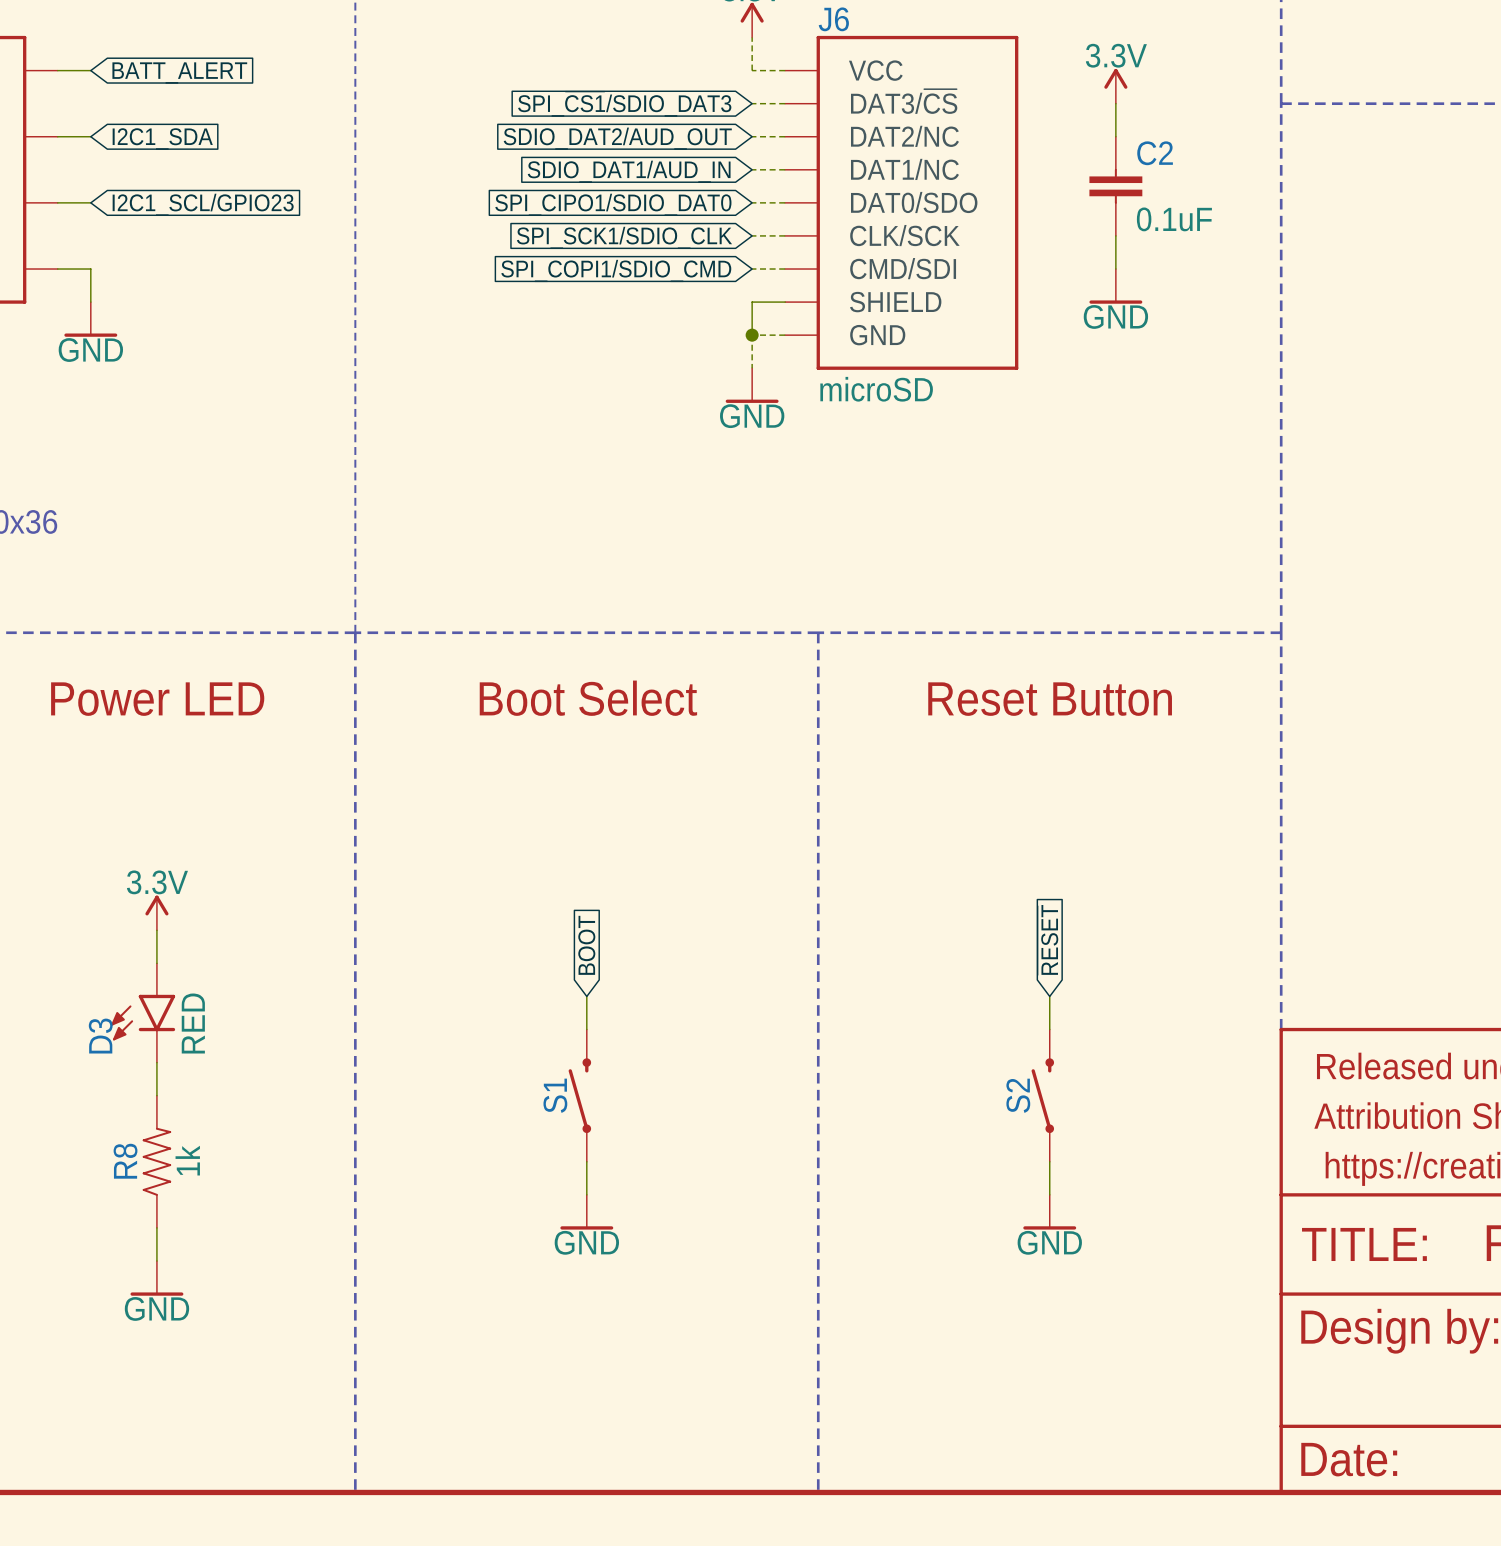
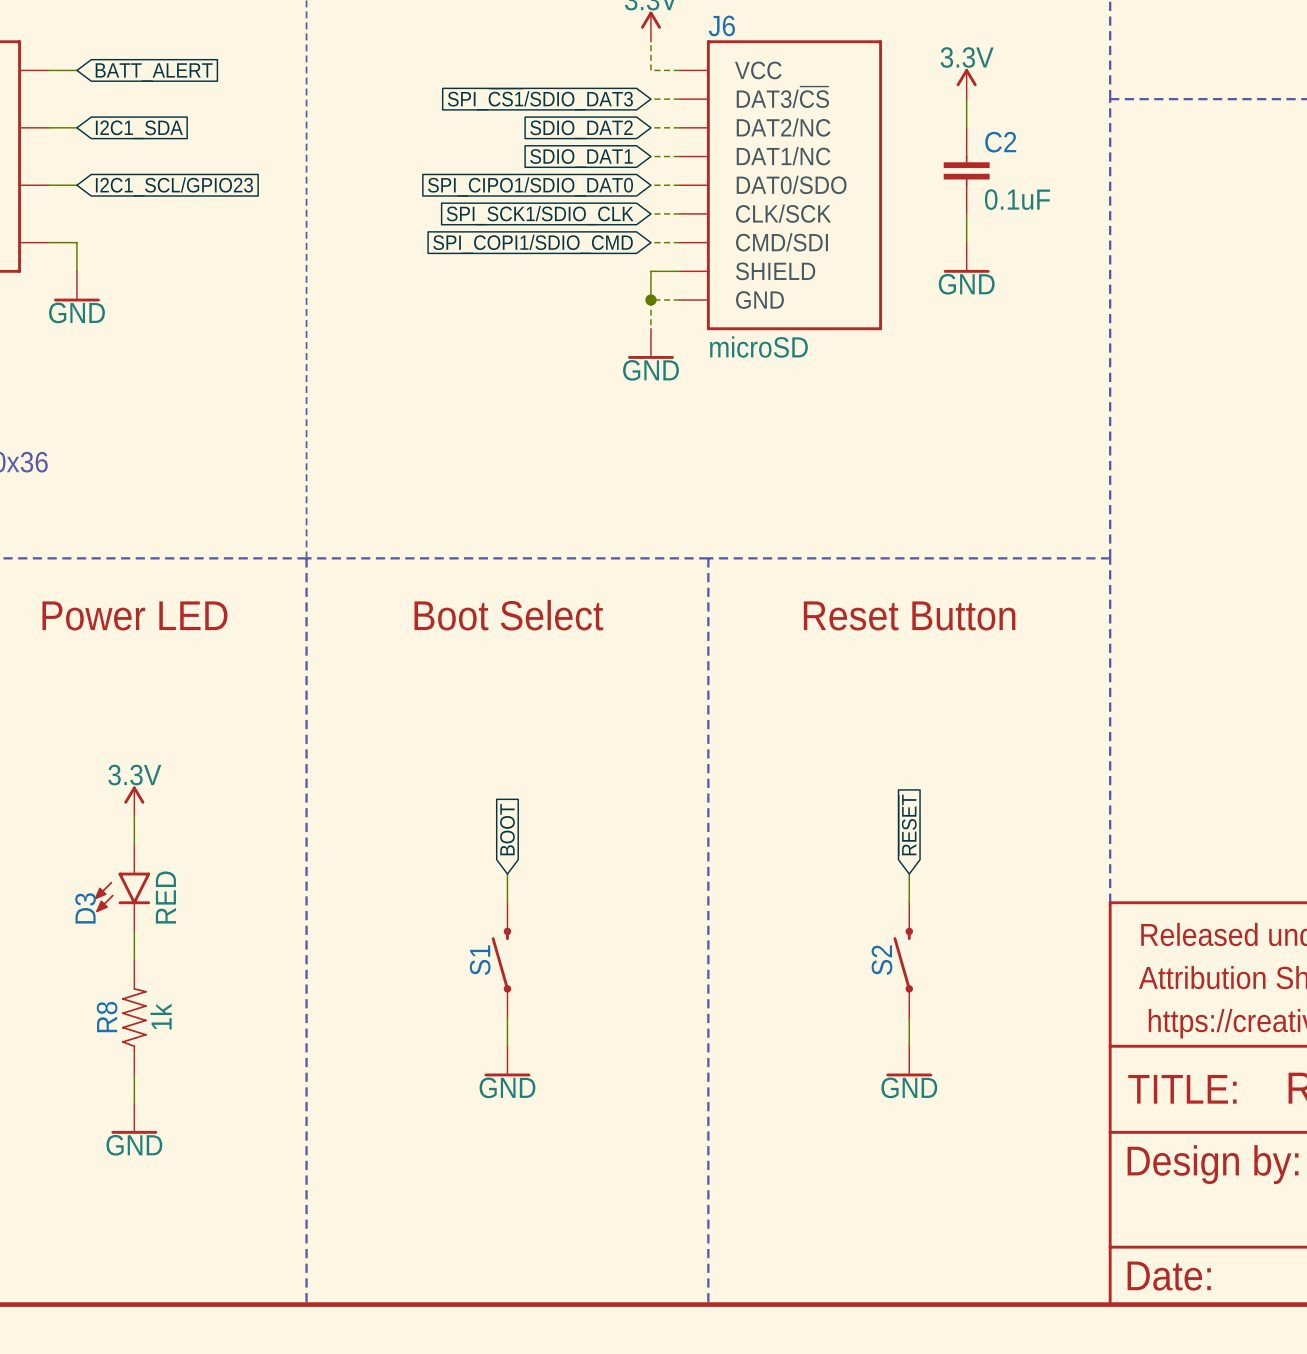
global label: SDIO_DAT2/AUD_OUT (617, 138) -> SDIO_DAT2 (581, 129)
global label: SDIO_DAT1/AUD_IN (629, 171) -> SDIO_DAT1 (581, 158)

